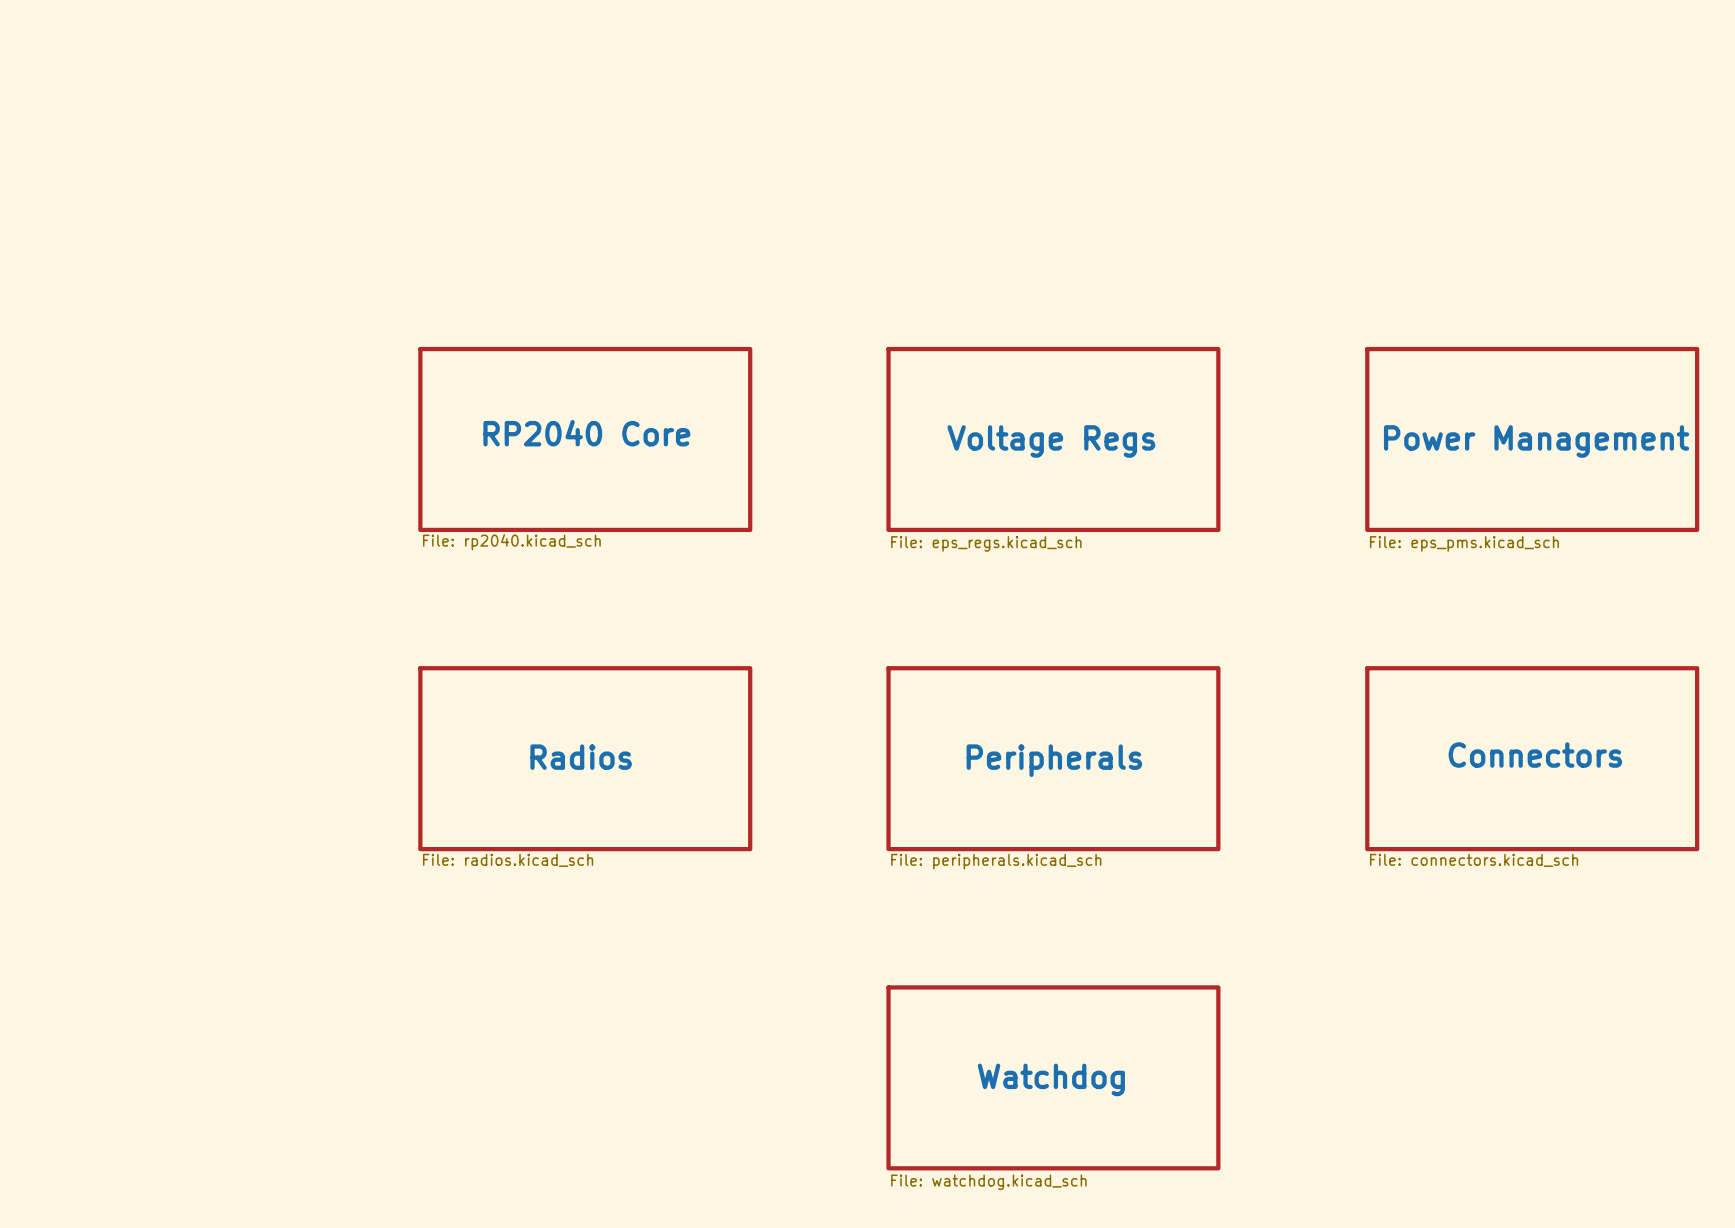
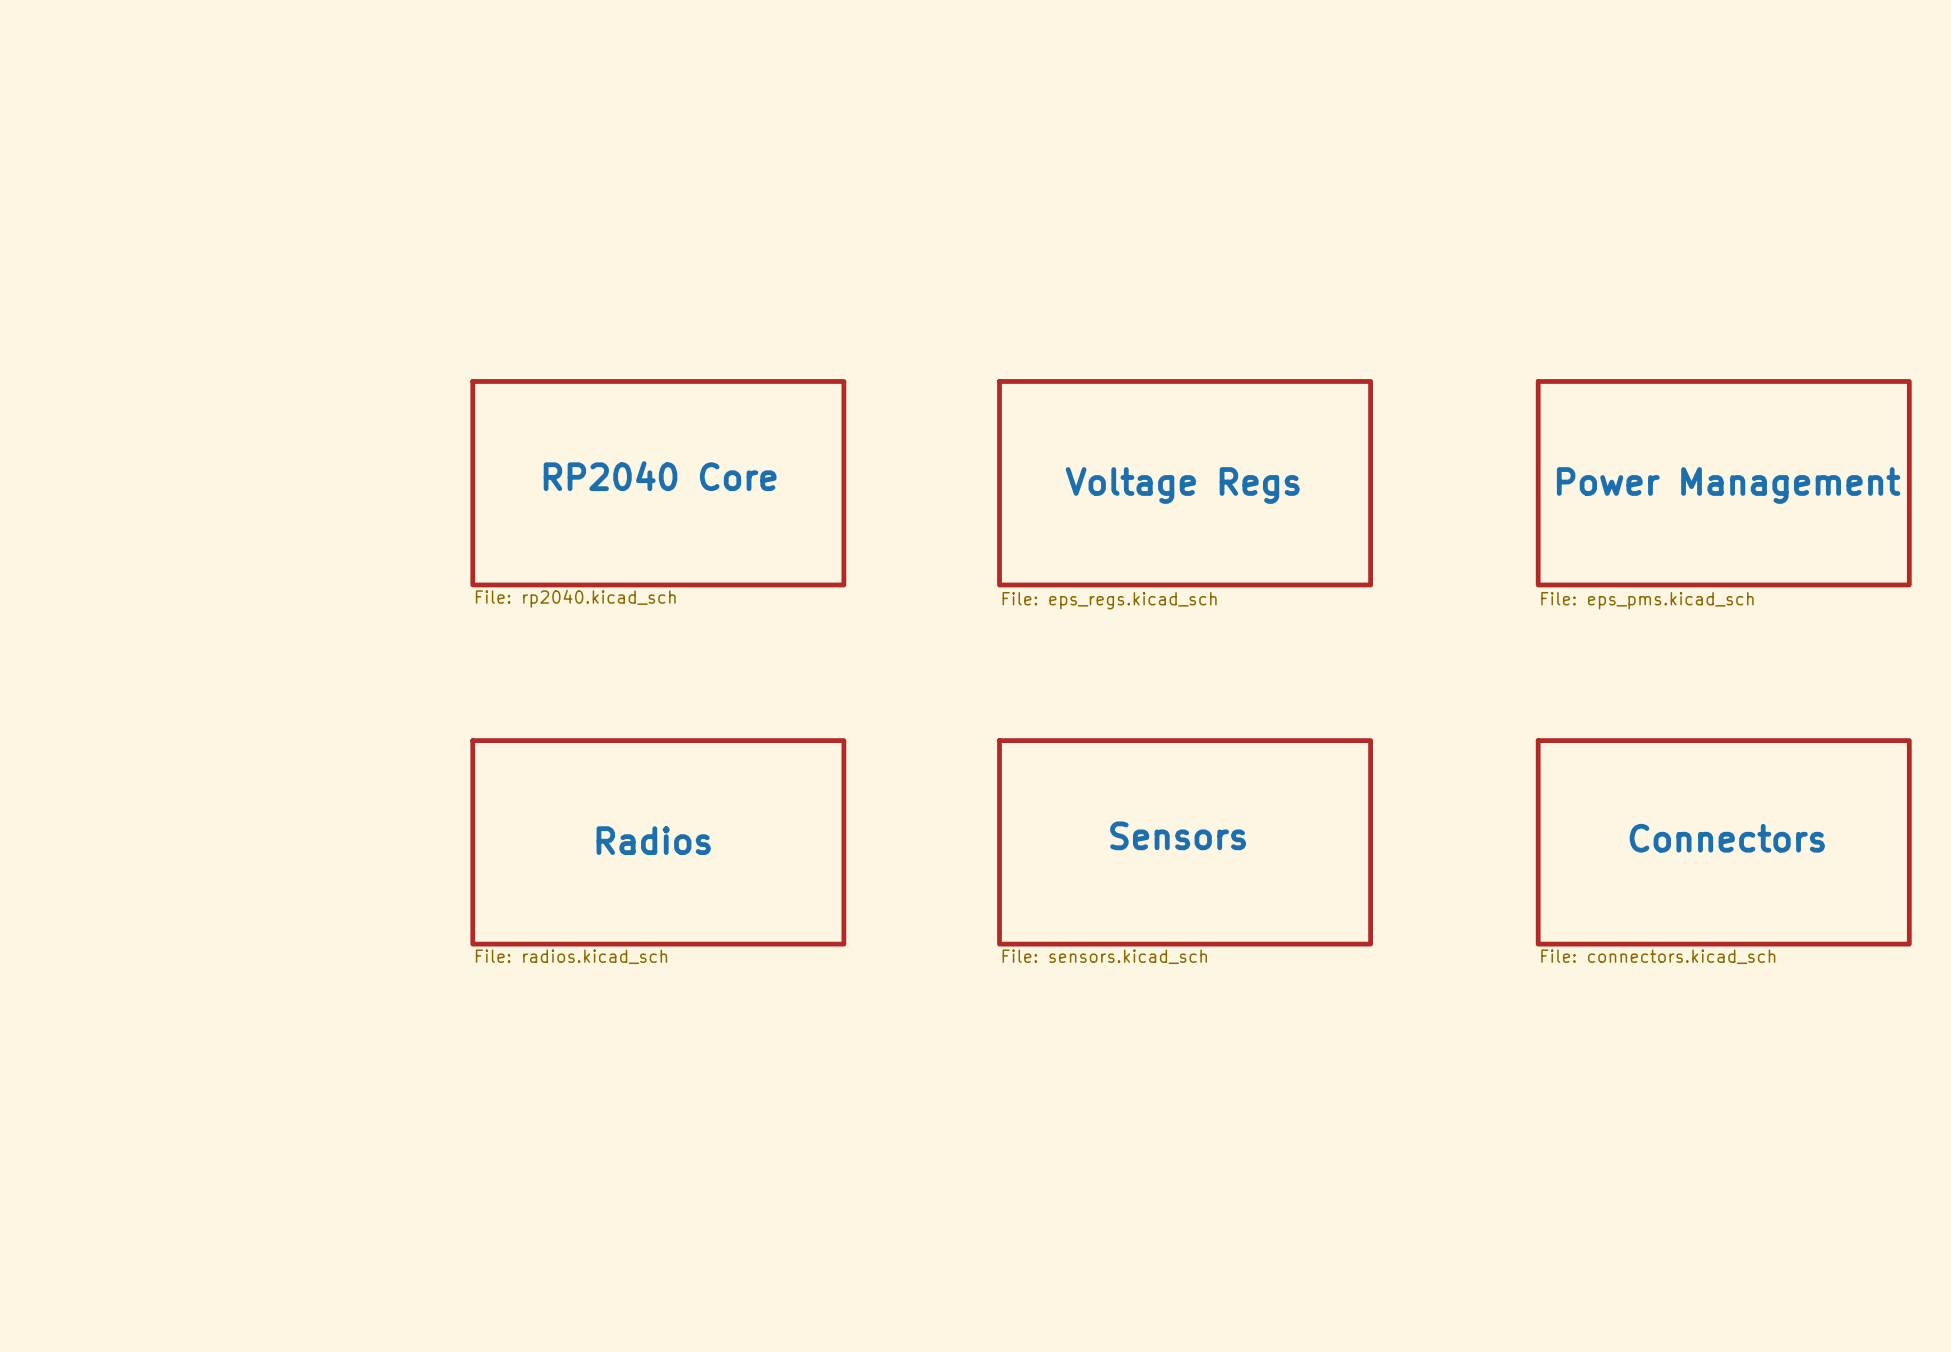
sheet Peripherals name: Peripherals (1054, 760) -> Sensors (1178, 835)
sheet Peripherals value: File: peripherals.kicad_sch (996, 861) -> File: sensors.kicad_sch (1104, 956)
sheet Watchdog: File: watchdog.kicad_sch (1053, 1077) -> none

